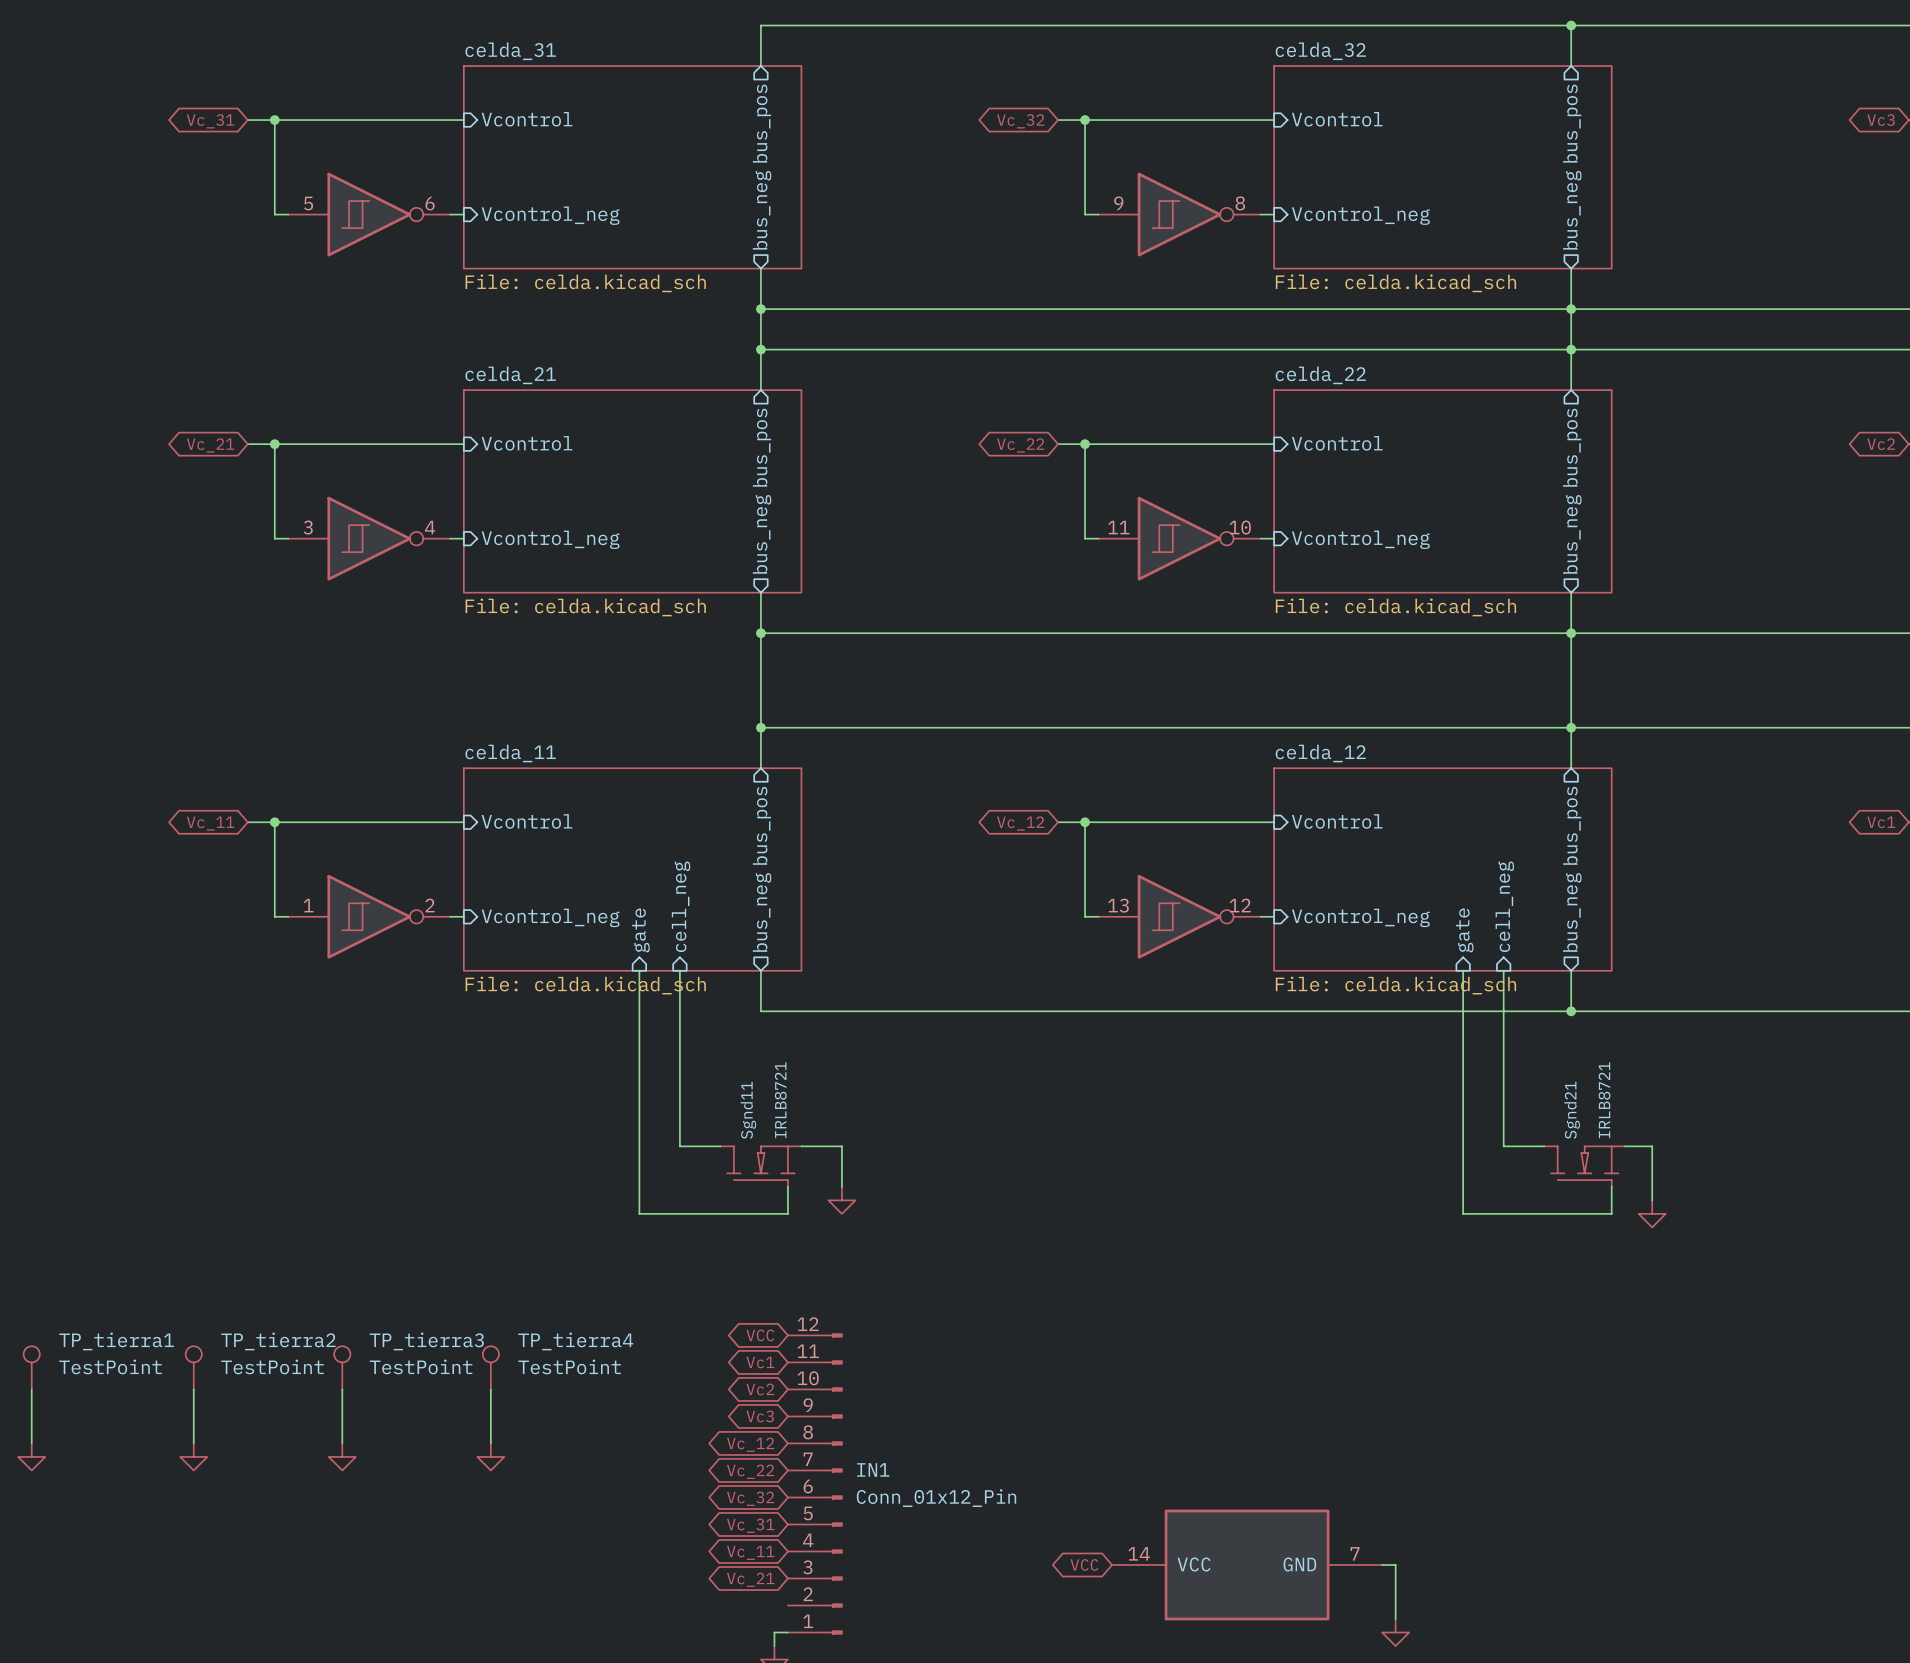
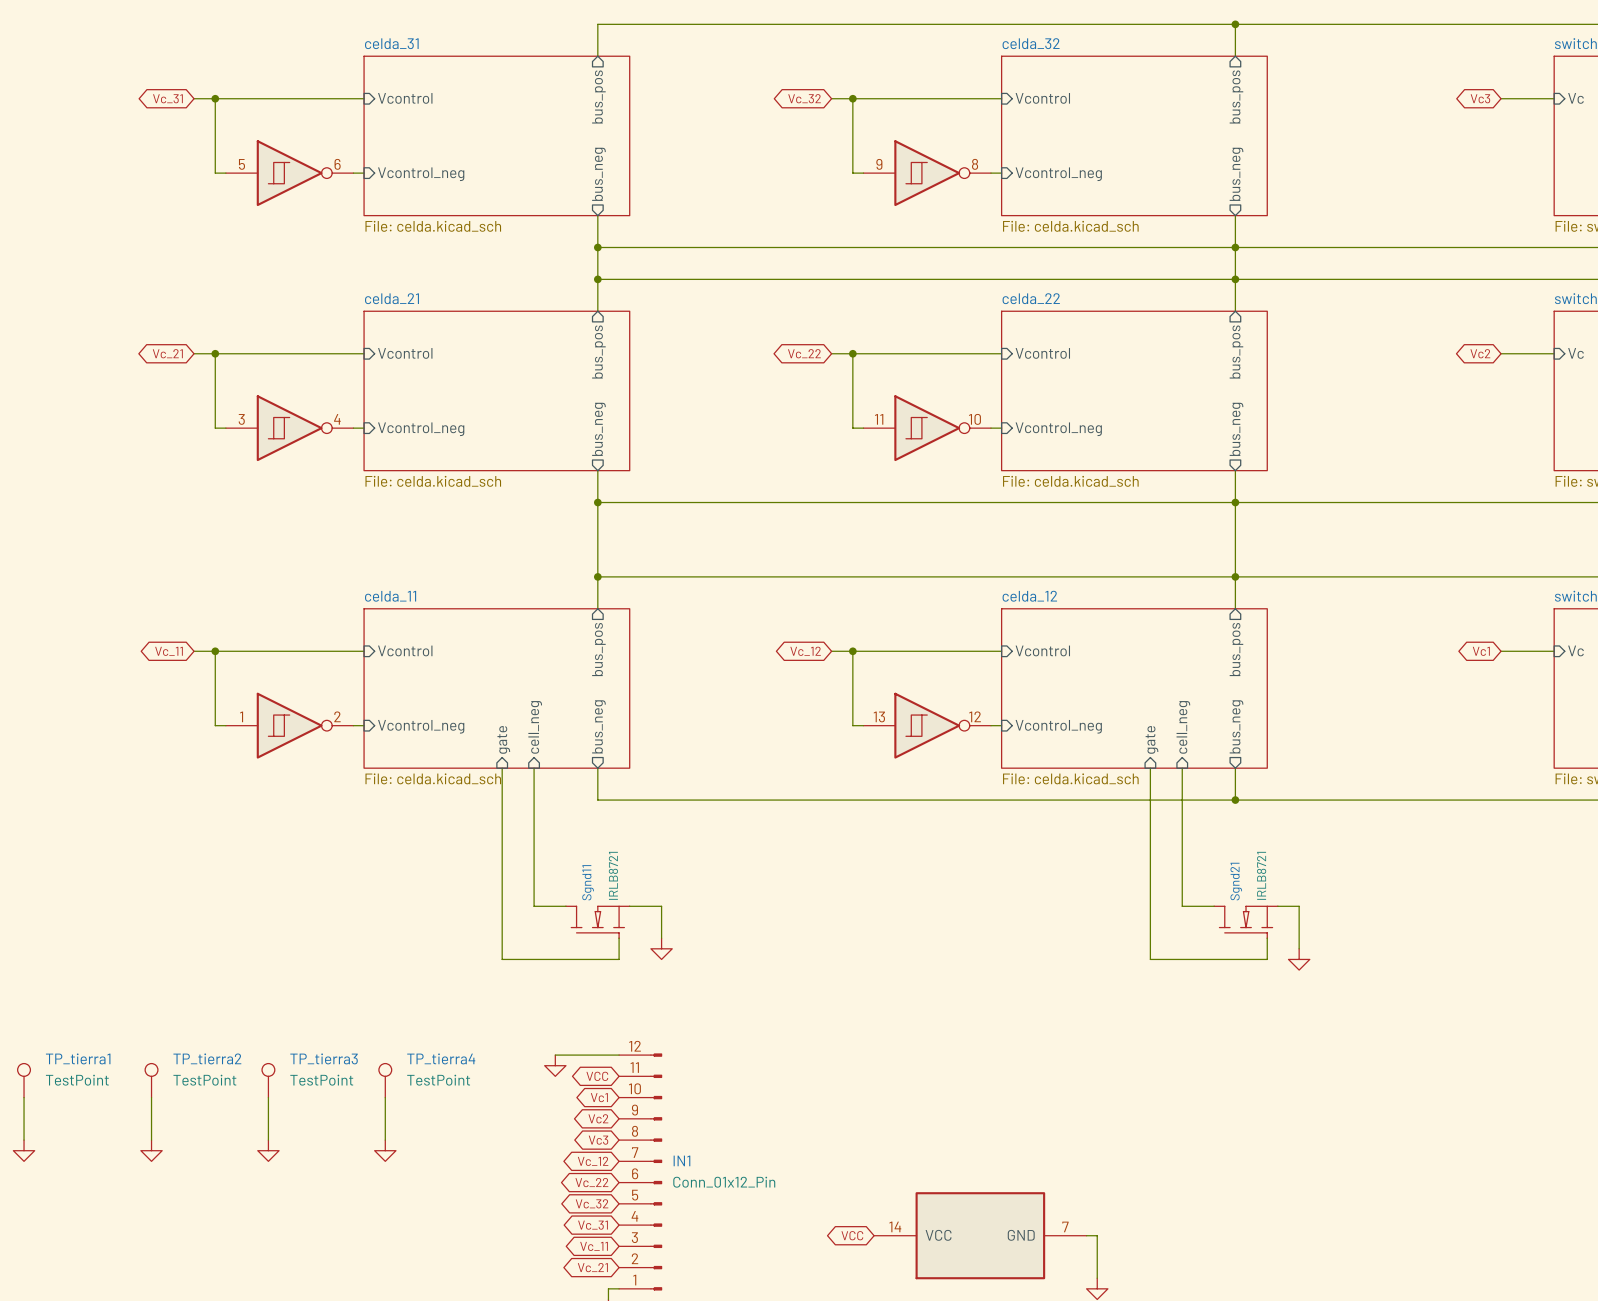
wire: none -> (555, 1055) (619, 1055)
global label: VCC (760, 1335) -> none
power symbol: none -> (555, 1065)
global label: Vc1 (760, 1362) -> VCC (597, 1076)
global label: Vc2 (760, 1389) -> Vc1 (599, 1097)
global label: Vc3 (760, 1416) -> Vc2 (598, 1118)
global label: Vc_12 (750, 1444) -> Vc3 (598, 1140)
global label: Vc_22 (750, 1471) -> Vc_12 (593, 1161)
global label: Vc_32 (750, 1498) -> Vc_22 (591, 1182)
global label: Vc_31 (750, 1525) -> Vc_32 (592, 1203)
global label: Vc_11 (750, 1552) -> Vc_31 (592, 1225)
global label: Vc_21 (750, 1579) -> Vc_11 (594, 1246)
global label: none -> Vc_21 (592, 1267)

